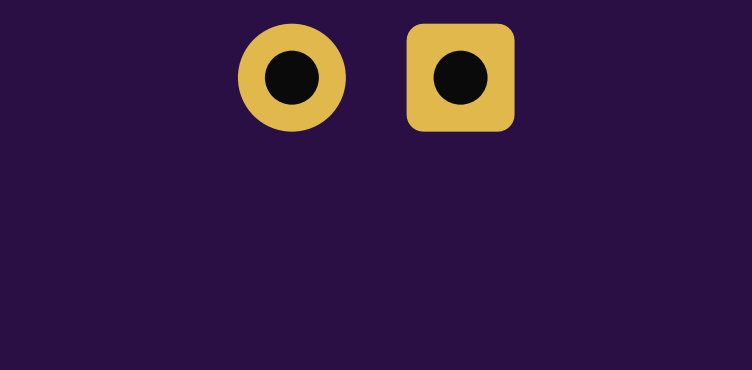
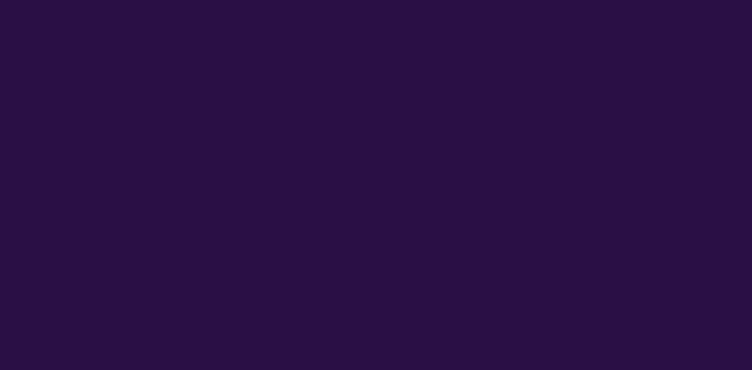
part: (376, 77) -> none

